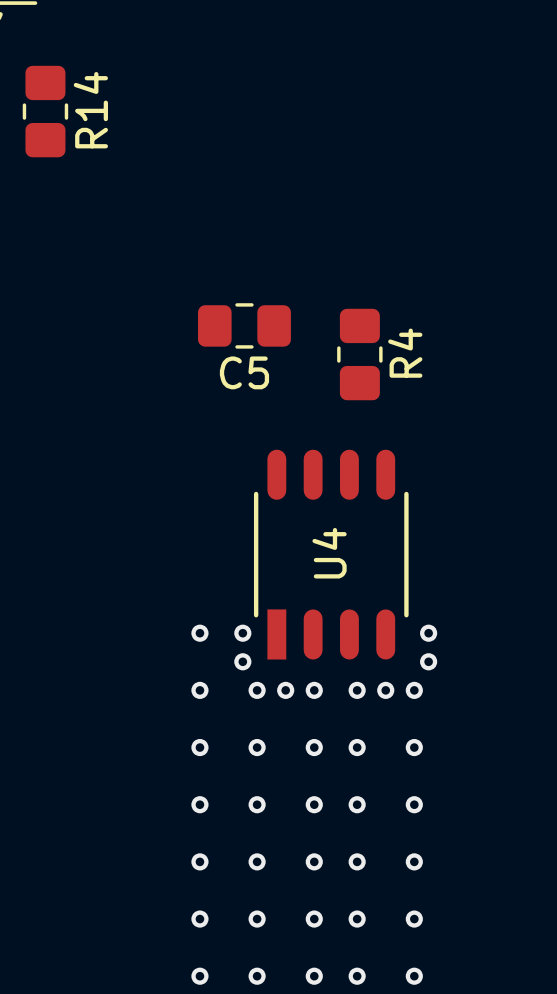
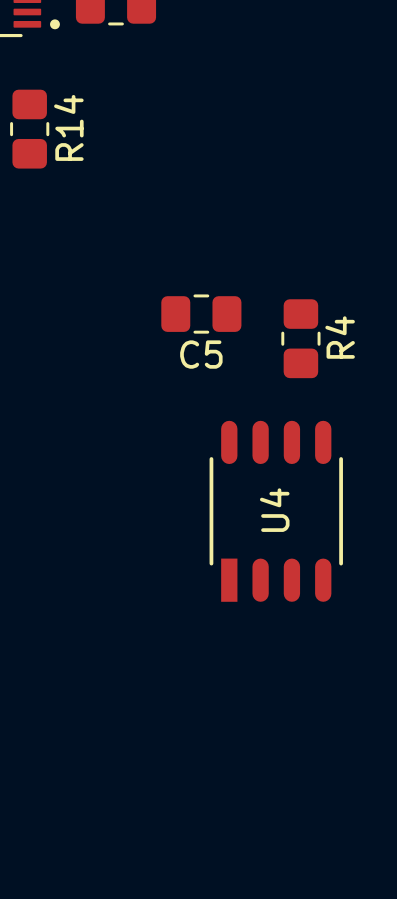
via: (199, 633) -> none
via: (242, 633) -> none
via: (428, 633) -> none
via: (242, 661) -> none
via: (428, 661) -> none
via: (199, 690) -> none
via: (257, 690) -> none
via: (285, 690) -> none
via: (314, 690) -> none
via: (357, 690) -> none
via: (385, 690) -> none
via: (414, 690) -> none
via: (199, 747) -> none
via: (257, 747) -> none
via: (314, 747) -> none
via: (357, 747) -> none
via: (414, 747) -> none
via: (199, 804) -> none
via: (257, 804) -> none
via: (314, 804) -> none
via: (357, 804) -> none
via: (414, 804) -> none
via: (199, 861) -> none
via: (257, 861) -> none
via: (314, 861) -> none
via: (357, 861) -> none
via: (414, 861) -> none
via: (199, 919) -> none
via: (257, 919) -> none
via: (314, 919) -> none
via: (357, 919) -> none
via: (414, 919) -> none
via: (199, 976) -> none
via: (257, 976) -> none
via: (314, 976) -> none
via: (357, 976) -> none
via: (414, 976) -> none

